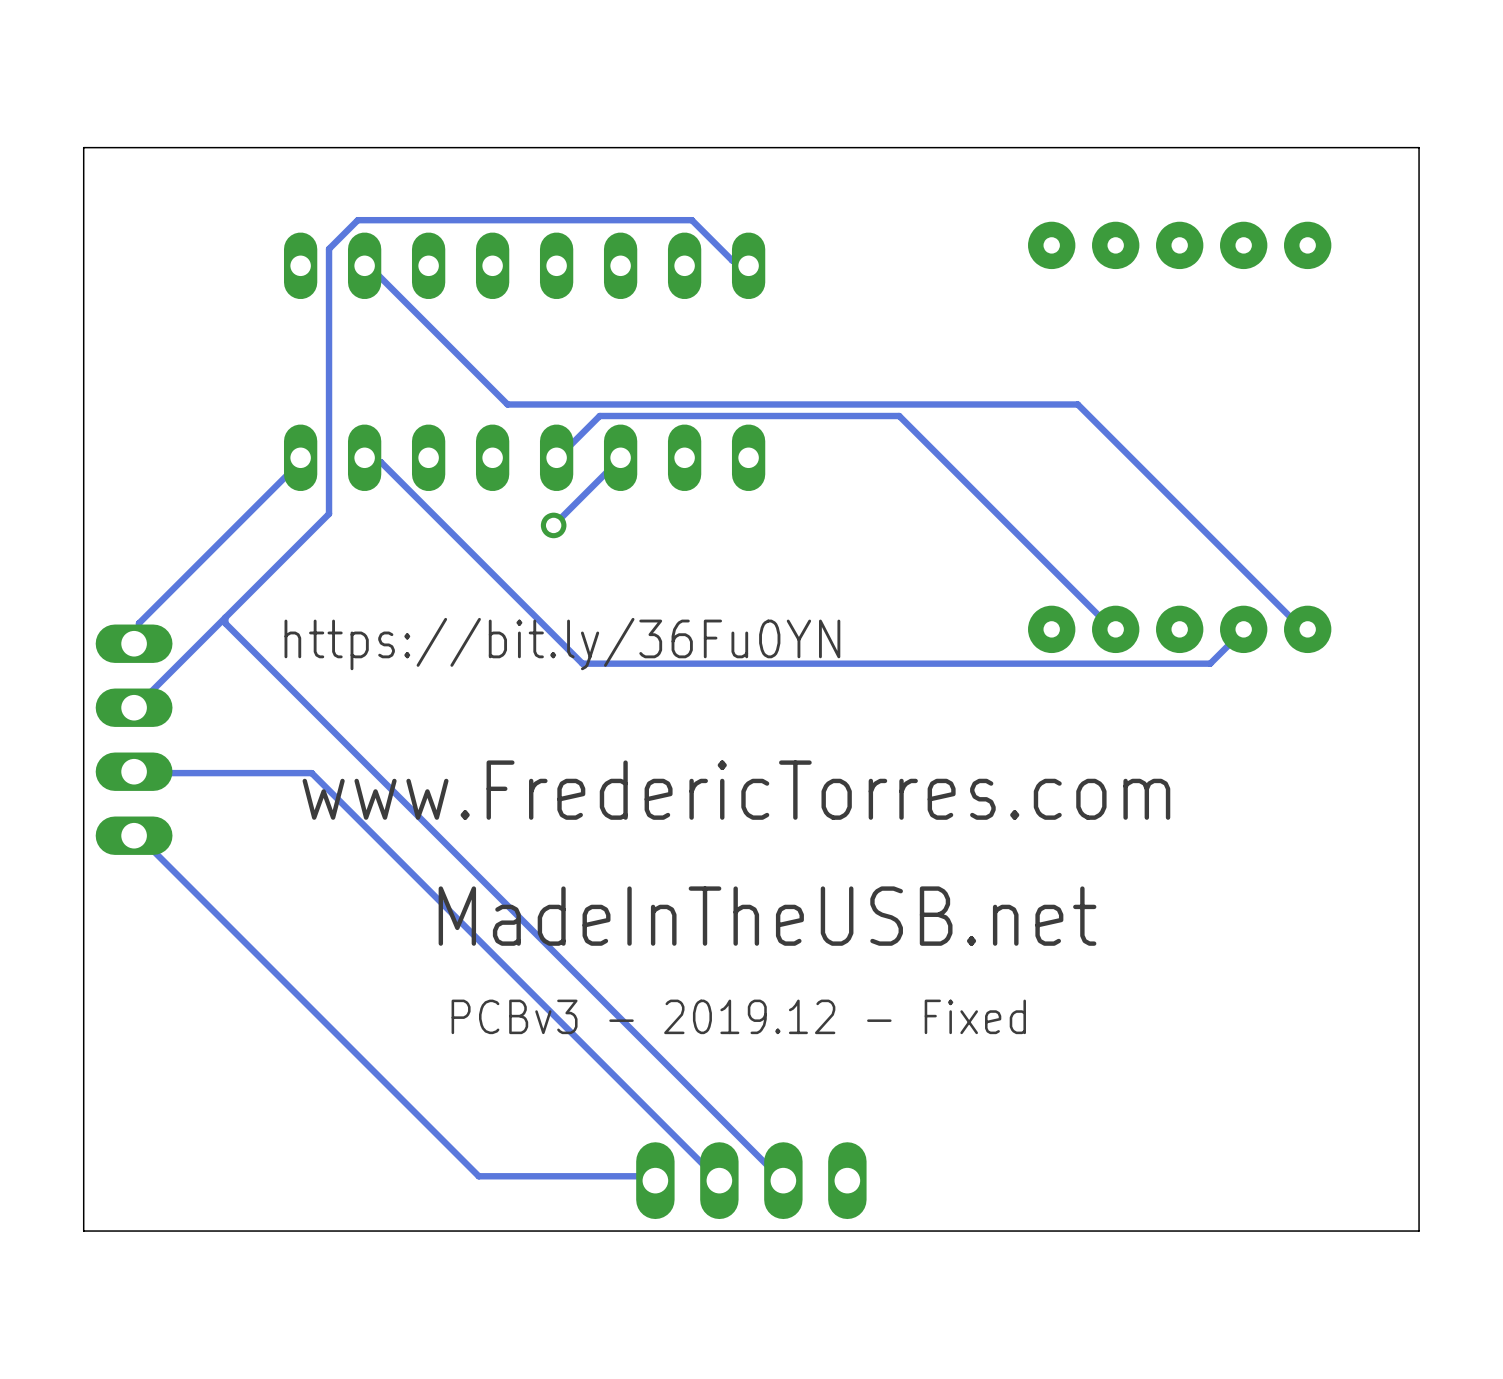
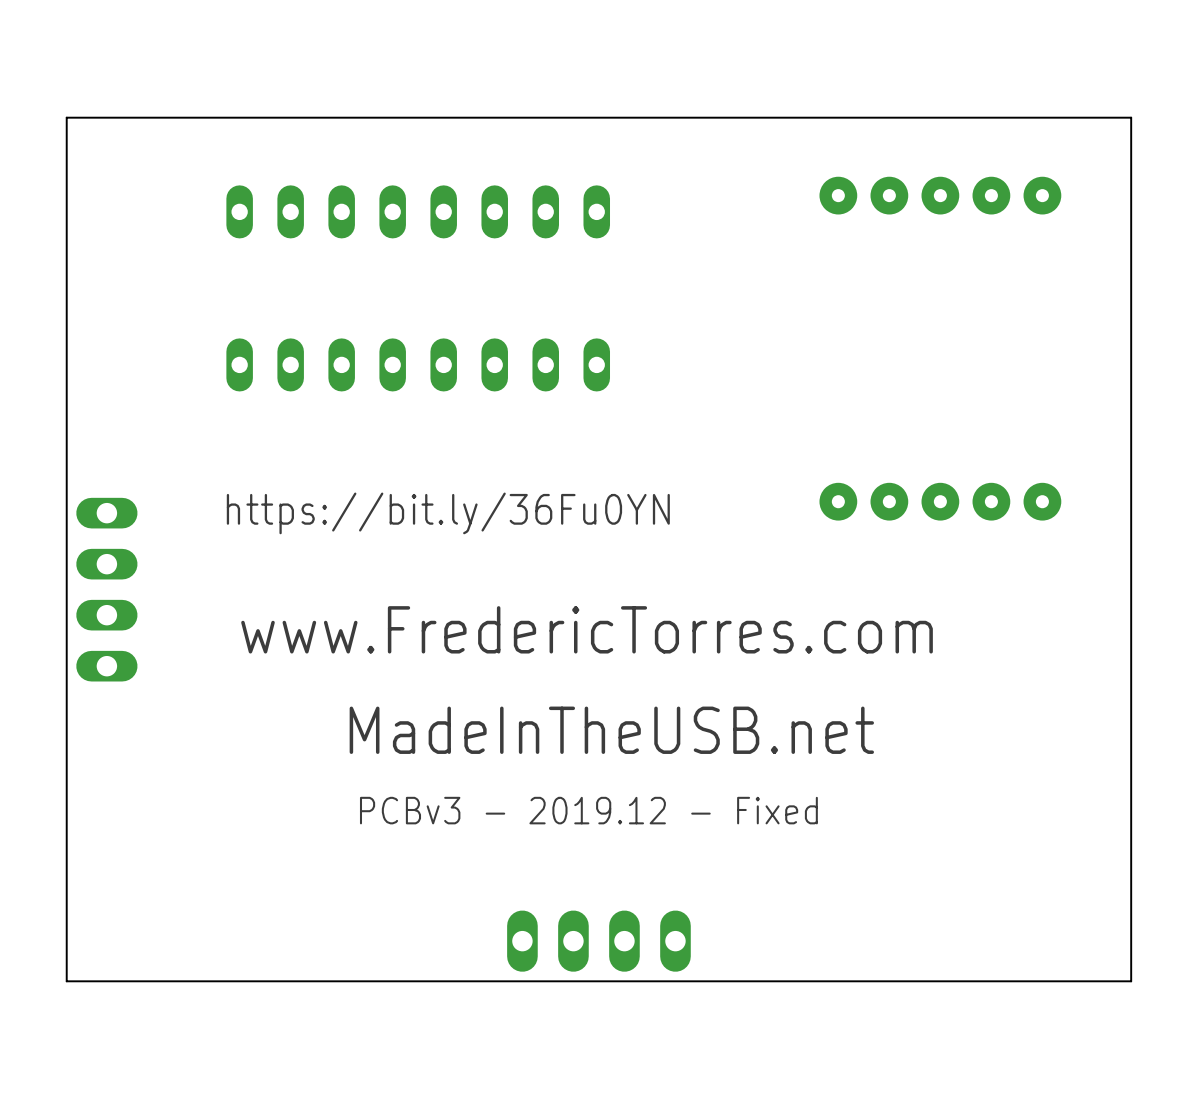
track: (364, 265) (369, 266) (507, 404) (1077, 404) (1302, 629) (1307, 629) -> none
track: (748, 265) (743, 260) (732, 260) (691, 220) (357, 220) (329, 248) (329, 513) (134, 707) -> none
track: (300, 457) (300, 462) (138, 623) (138, 640) (134, 643) -> none
track: (364, 457) (369, 462) (380, 462) (582, 663) (1210, 663) (1243, 629) -> none
track: (556, 457) (599, 416) (899, 416) (1112, 629) (1115, 629) -> none
track: (620, 457) (553, 525) -> none
via: (553, 525) -> none
track: (225, 617) (225, 623) (783, 1180) -> none
track: (134, 771) (311, 773) (719, 1180) -> none
track: (134, 835) (138, 836) (478, 1176) (651, 1176) (655, 1180) -> none

